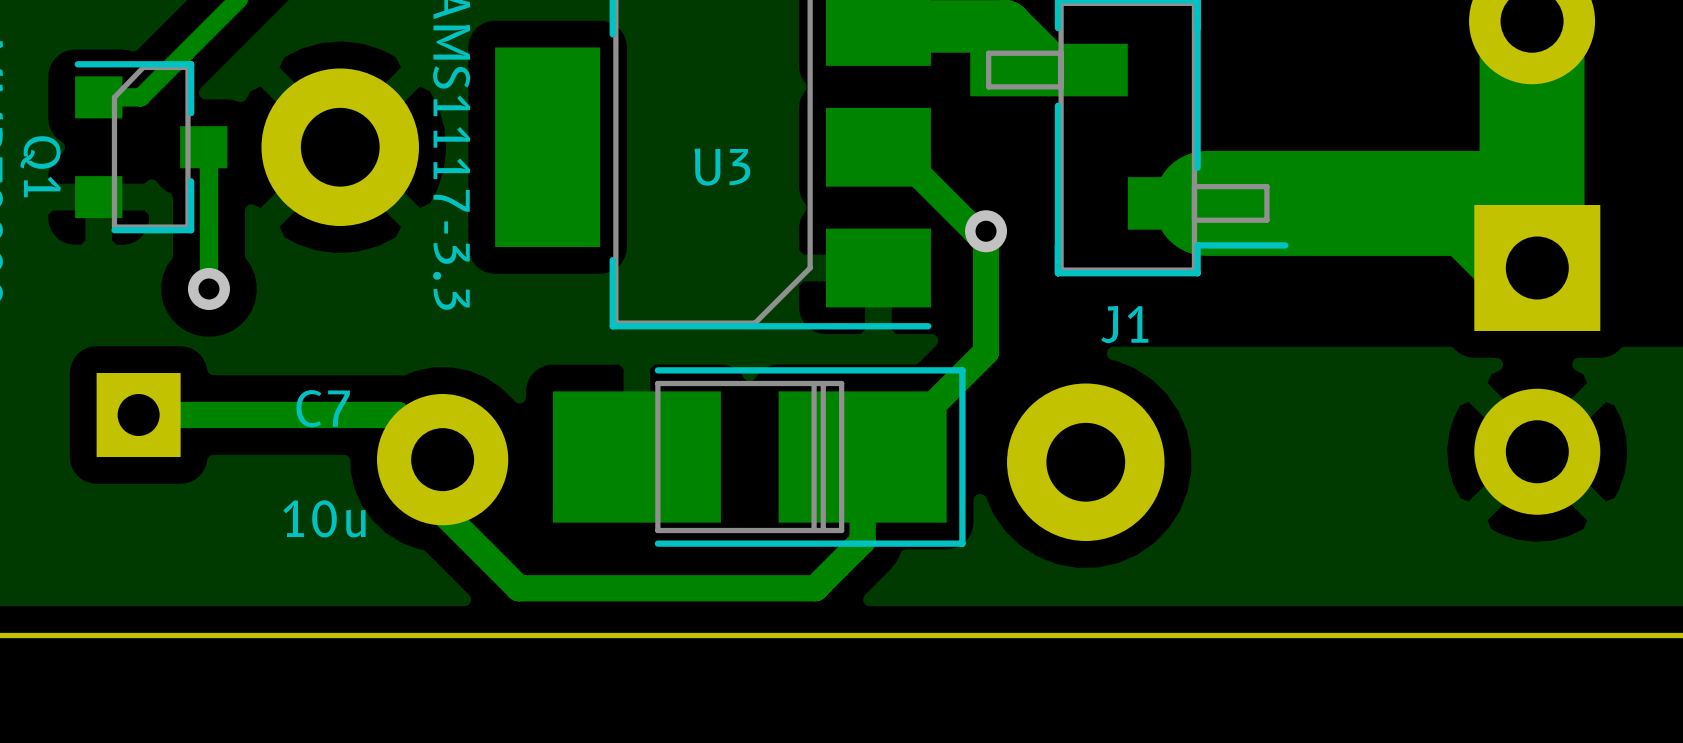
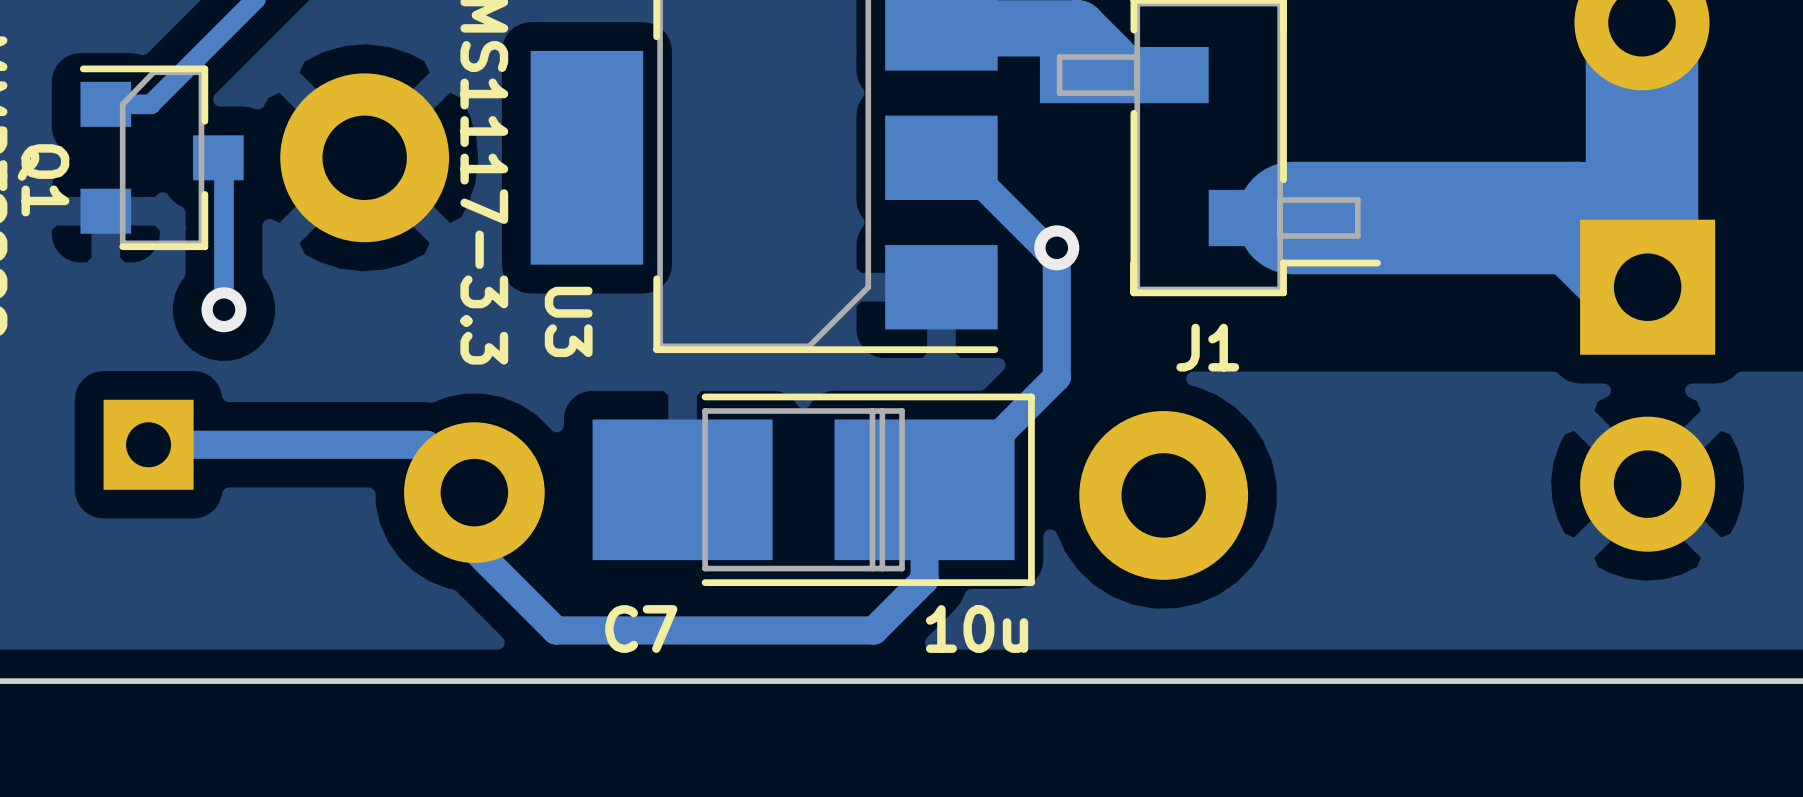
U3 name rotation: 0° (722, 167) -> 90° clockwise (568, 321)
U3 name position: U3 (722, 167) -> U3 (568, 321)
C7 name position: C7 (323, 408) -> C7 (641, 629)
C7 value position: 10u (324, 518) -> 10u (977, 629)

